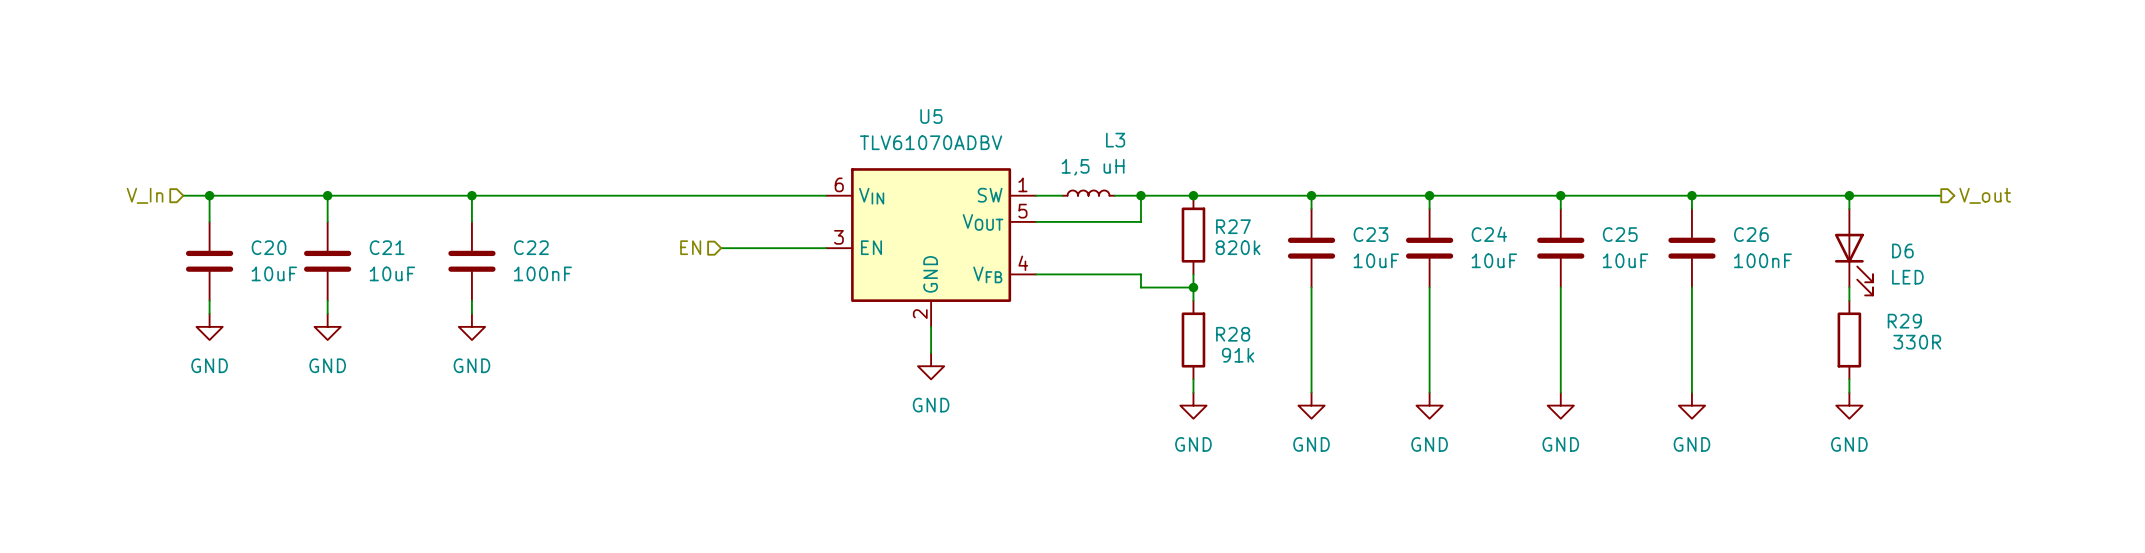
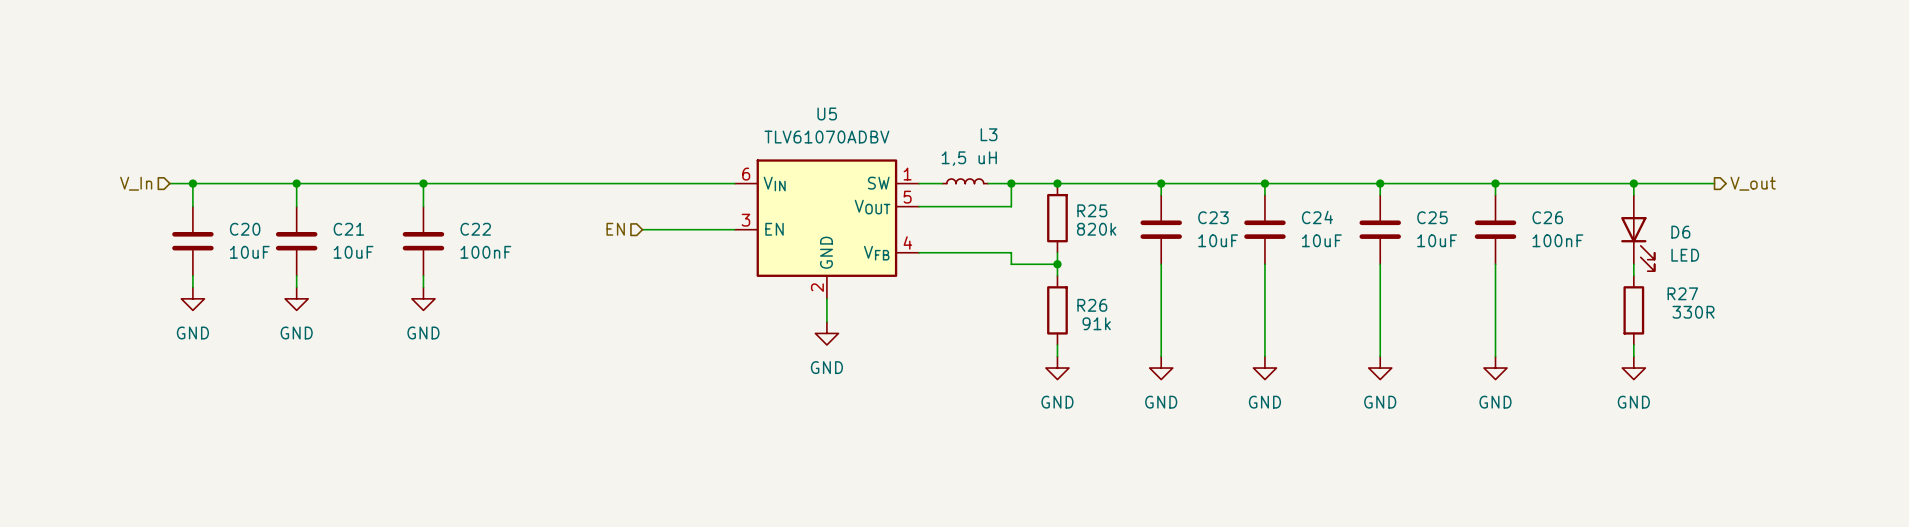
R27 name: R27 (1233, 226) -> R25 (1092, 210)
R29 name: R29 (1904, 321) -> R27 (1682, 293)
R28 name: R28 (1233, 334) -> R26 (1092, 305)

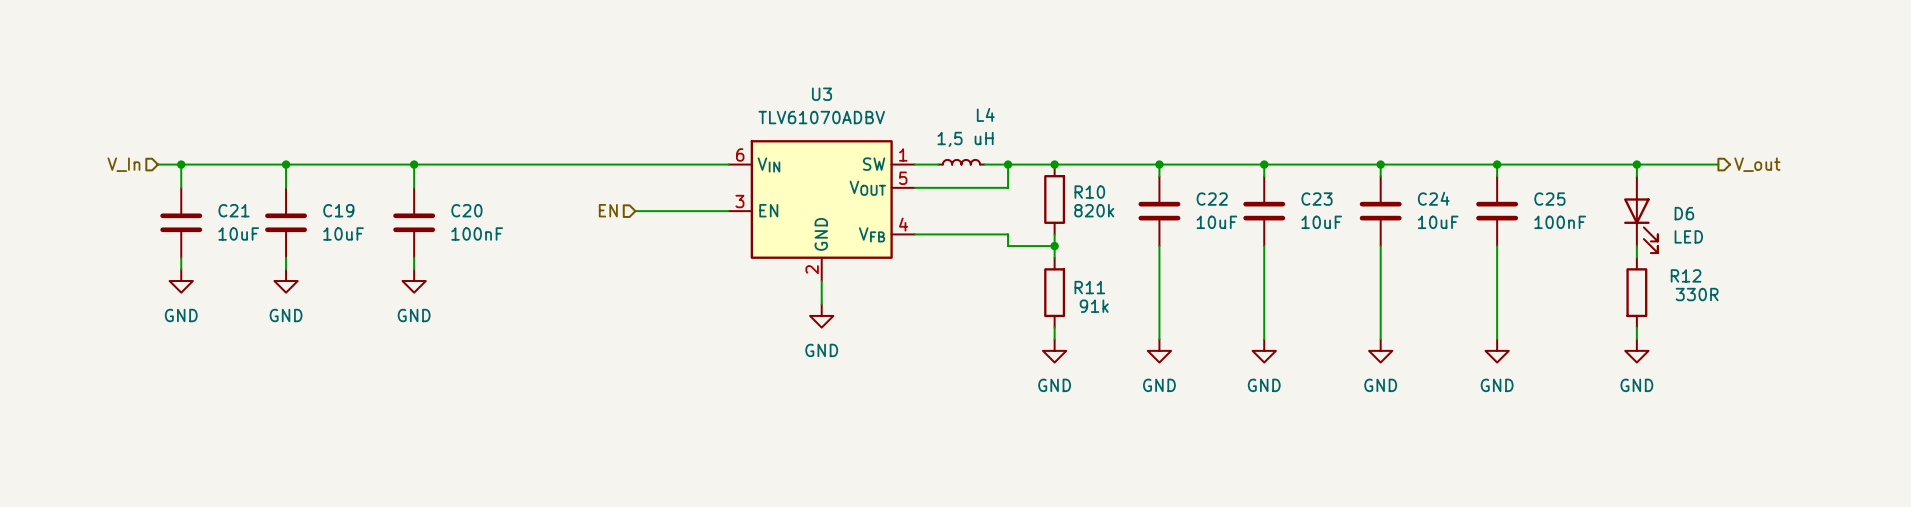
U5 name: U5 (827, 113) -> U3 (822, 94)
L3 name: L3 (989, 134) -> L4 (985, 114)
R25 name: R25 (1092, 210) -> R10 (1089, 192)
C23 name: C23 (1213, 217) -> C22 (1212, 199)
C24 name: C24 (1317, 217) -> C23 (1317, 199)
C25 name: C25 (1432, 217) -> C24 (1433, 198)
C26 name: C26 (1547, 217) -> C25 (1549, 199)
C20 name: C20 (245, 229) -> C21 (234, 210)
C21 name: C21 (348, 229) -> C19 (338, 210)
C22 name: C22 (475, 229) -> C20 (466, 210)
R27 name: R27 (1682, 293) -> R12 (1686, 275)
R26 name: R26 (1092, 305) -> R11 (1089, 287)

